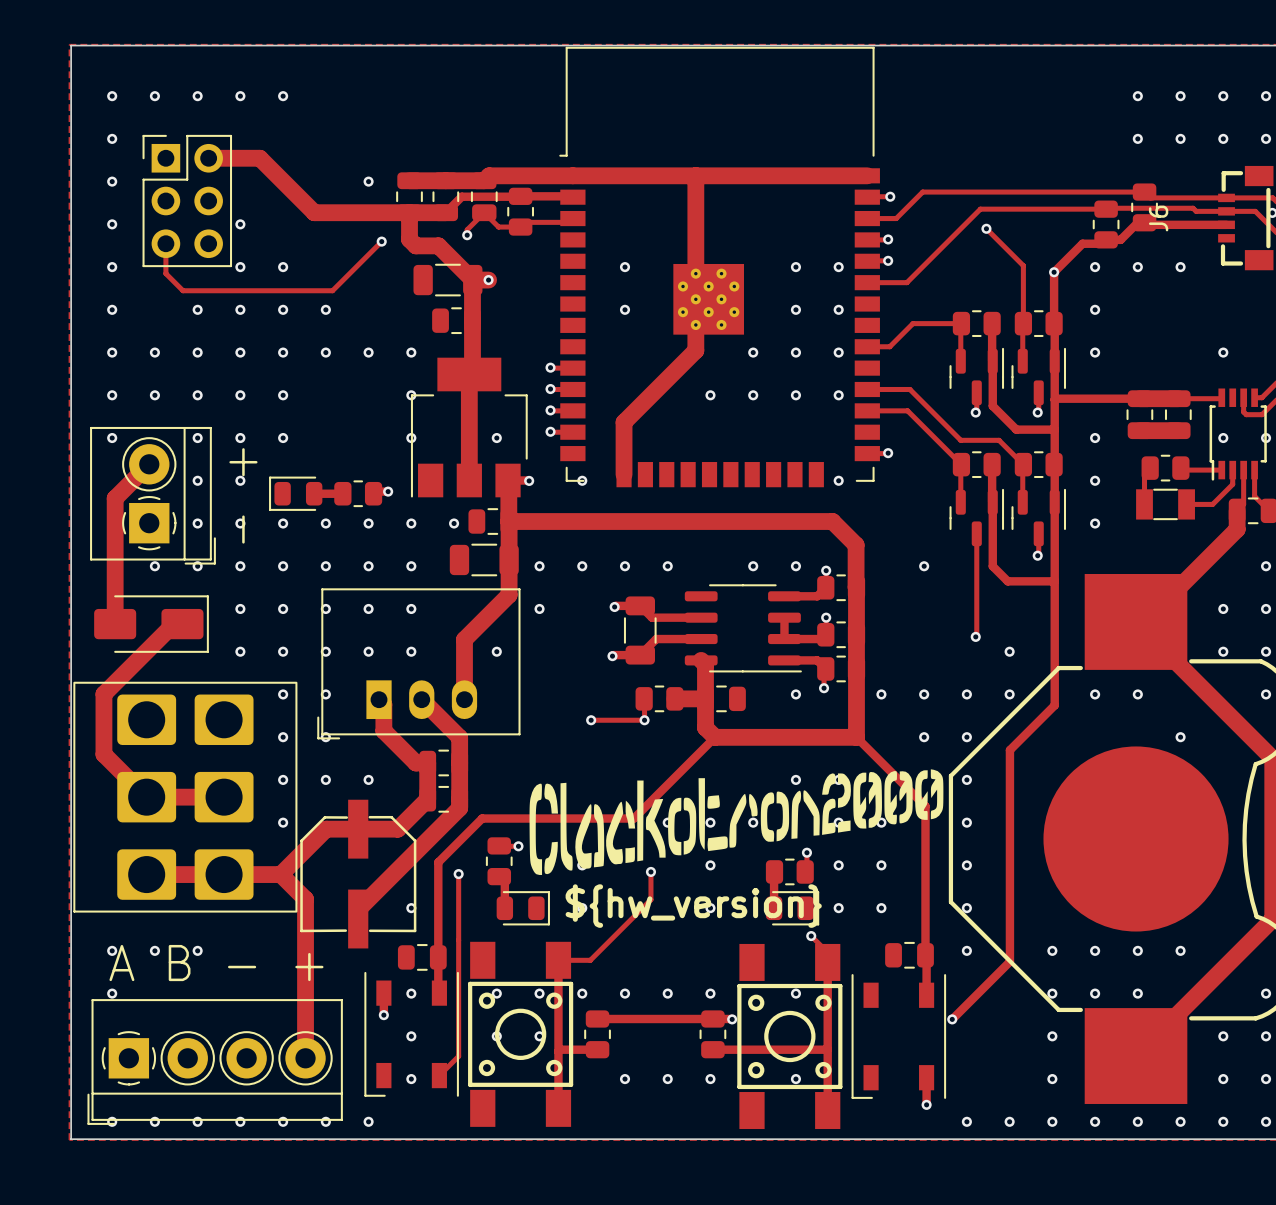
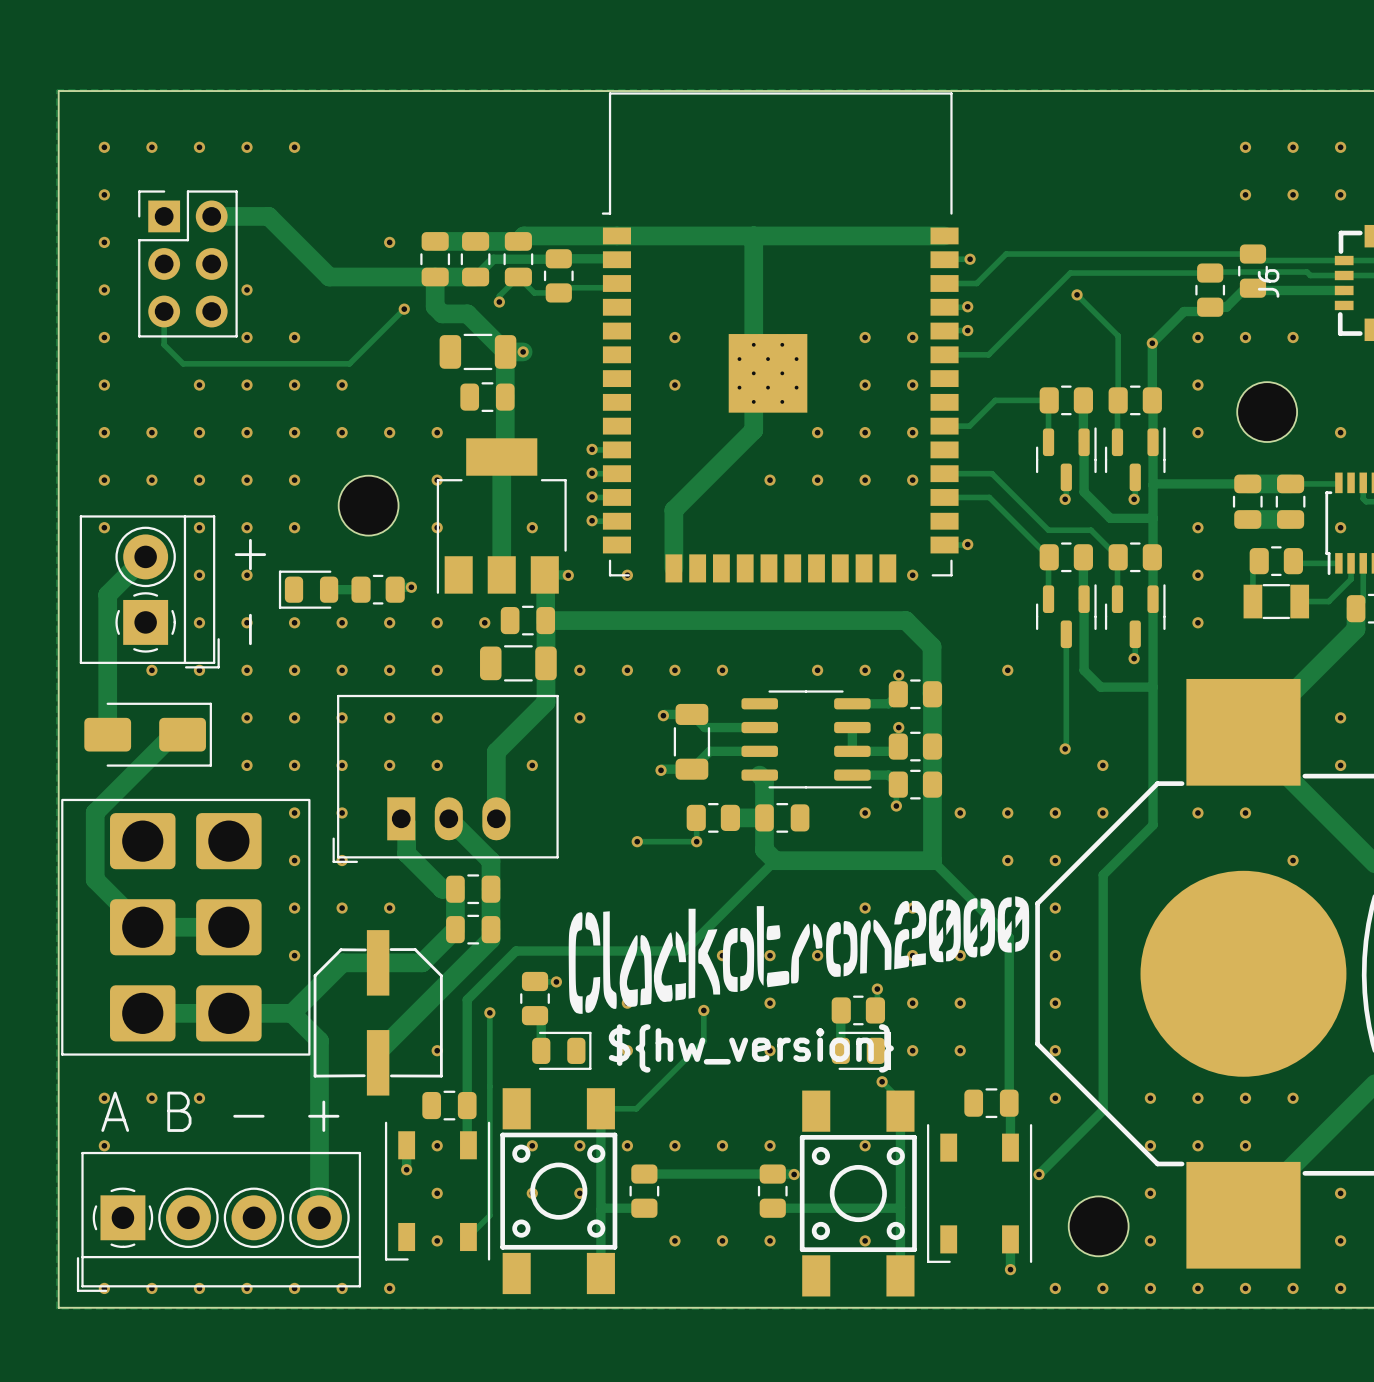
part: none -> (1267, 412)
part: none -> (368, 505)
part: none -> (1098, 1226)

